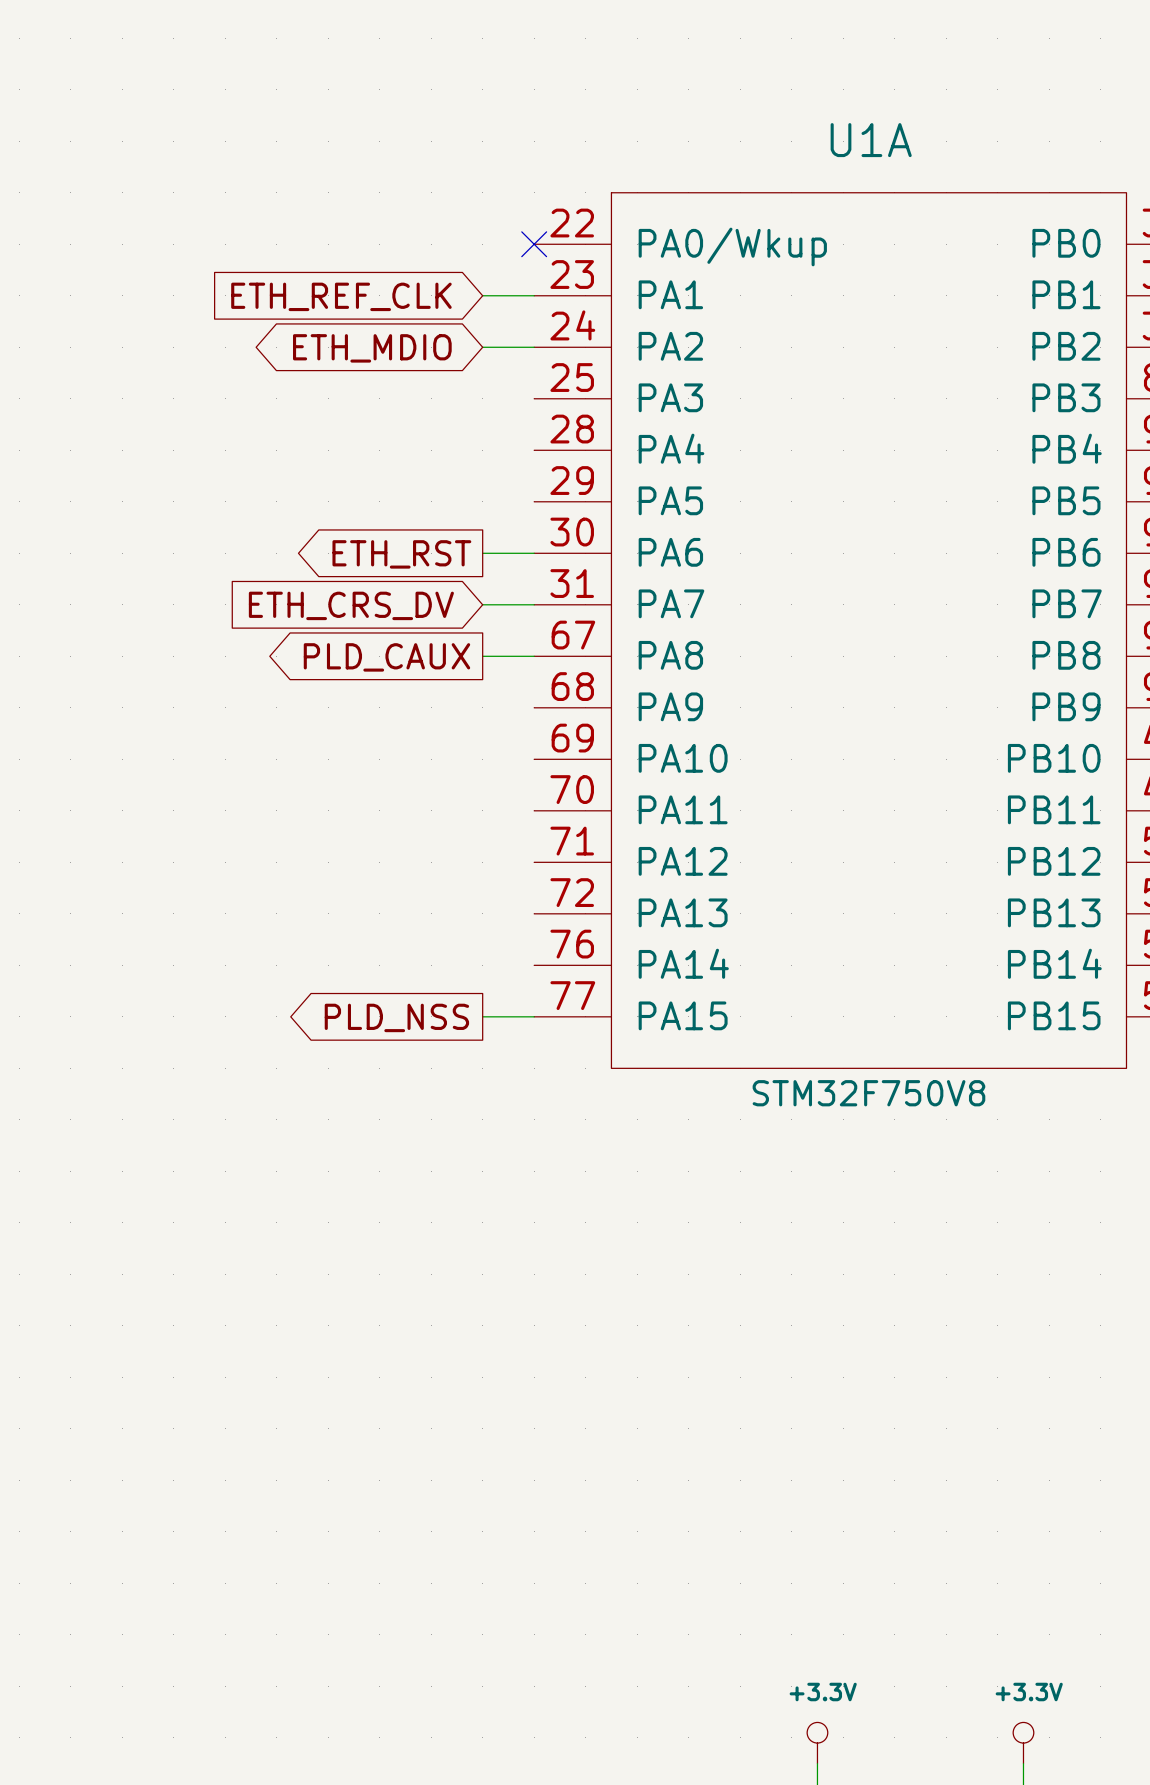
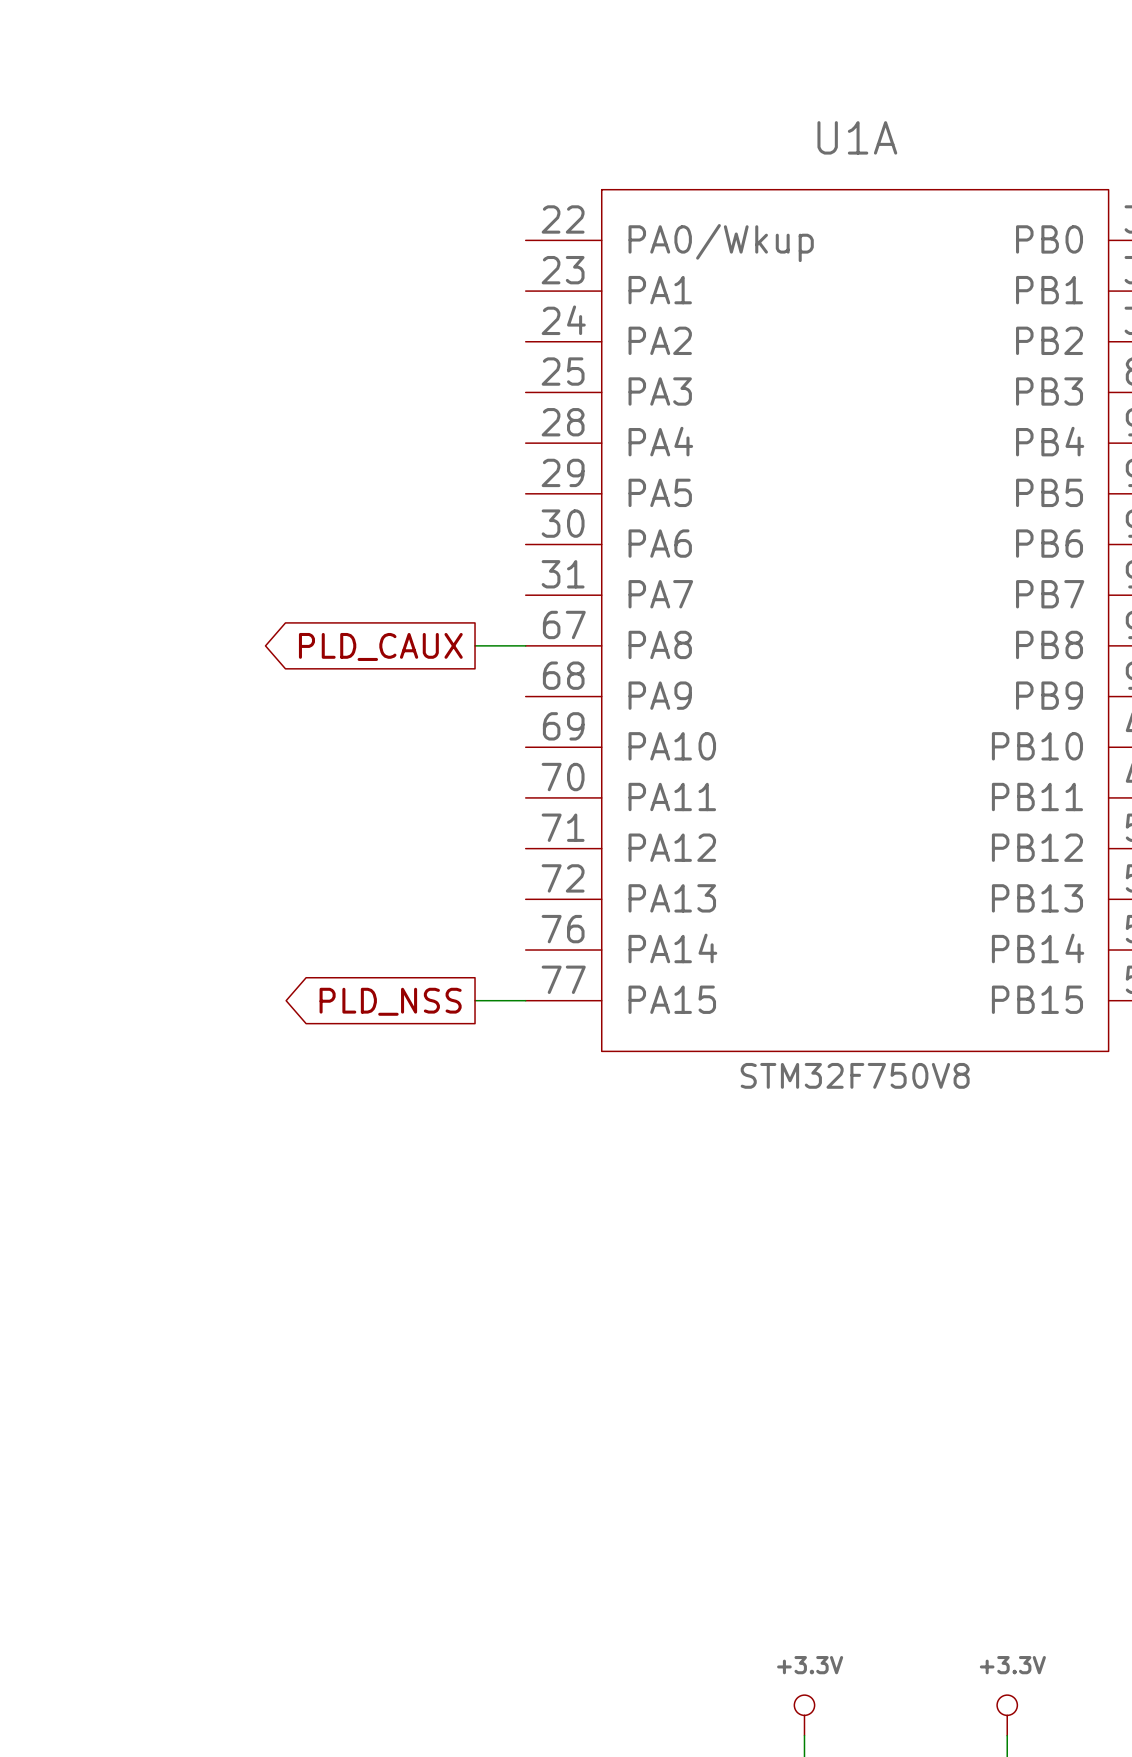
no-connect mark: (534, 244) -> none
wire: (482, 295) (534, 295) -> none
global label: ETH_REF_CLK (341, 296) -> none
wire: (482, 347) (534, 347) -> none
global label: ETH_MDIO (372, 348) -> none
wire: (482, 553) (534, 553) -> none
global label: ETH_RST (401, 554) -> none
wire: (482, 604) (534, 604) -> none
global label: ETH_CRS_DV (351, 605) -> none

